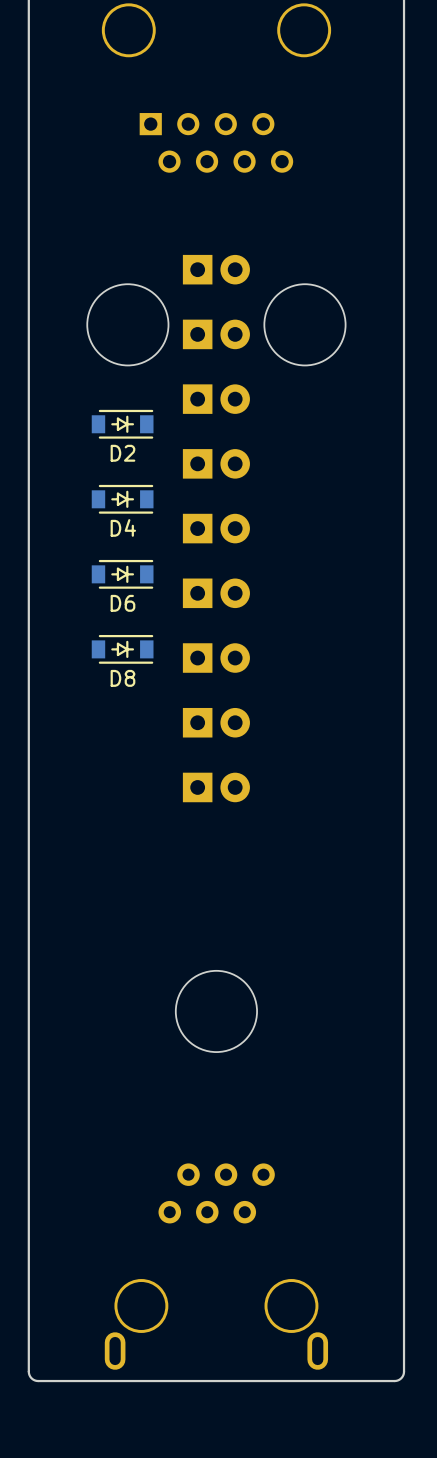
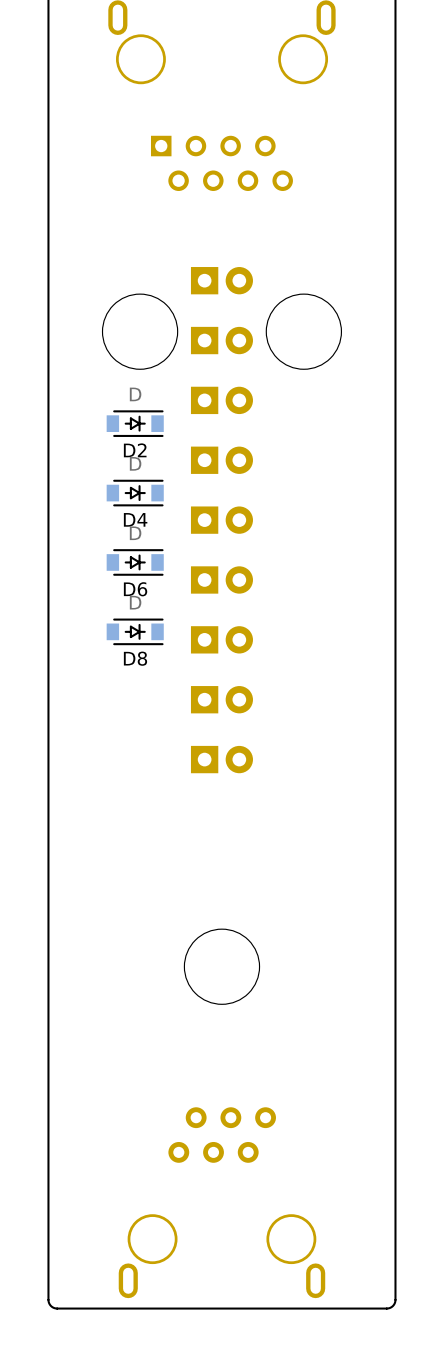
D2 value: none -> D (135, 394)
D4 value: none -> D (135, 463)
D6 value: none -> D (135, 533)
D8 value: none -> D (135, 602)

